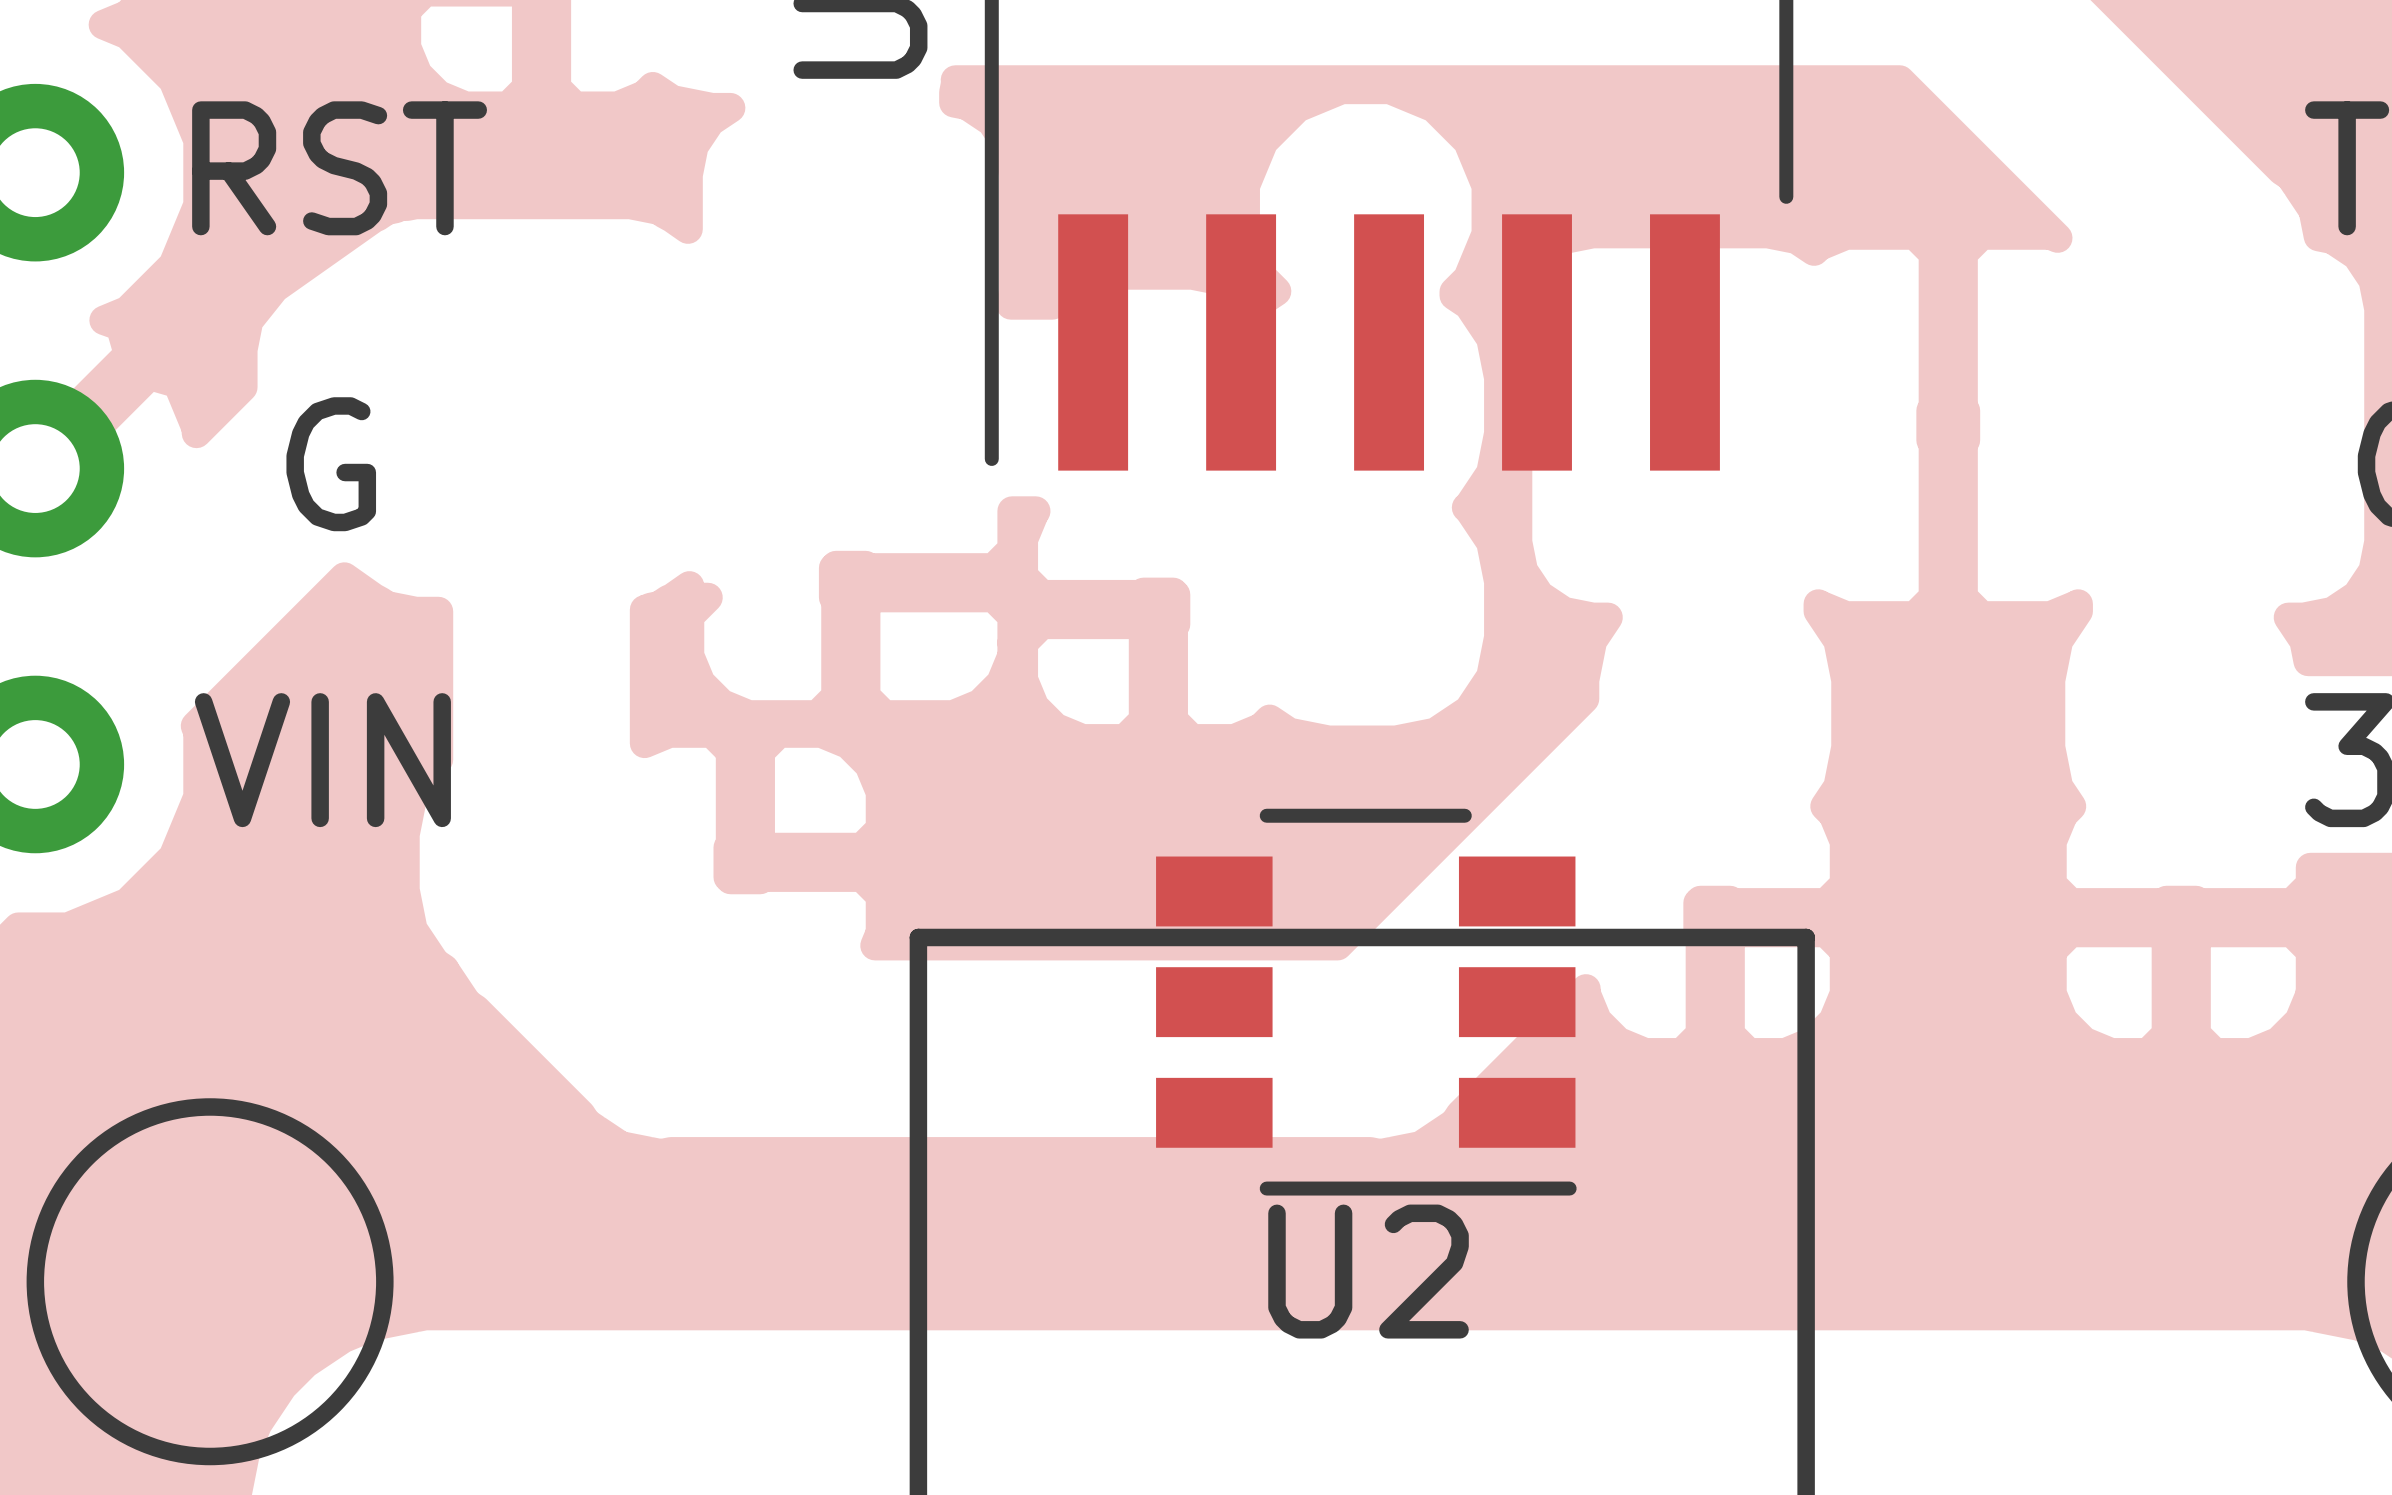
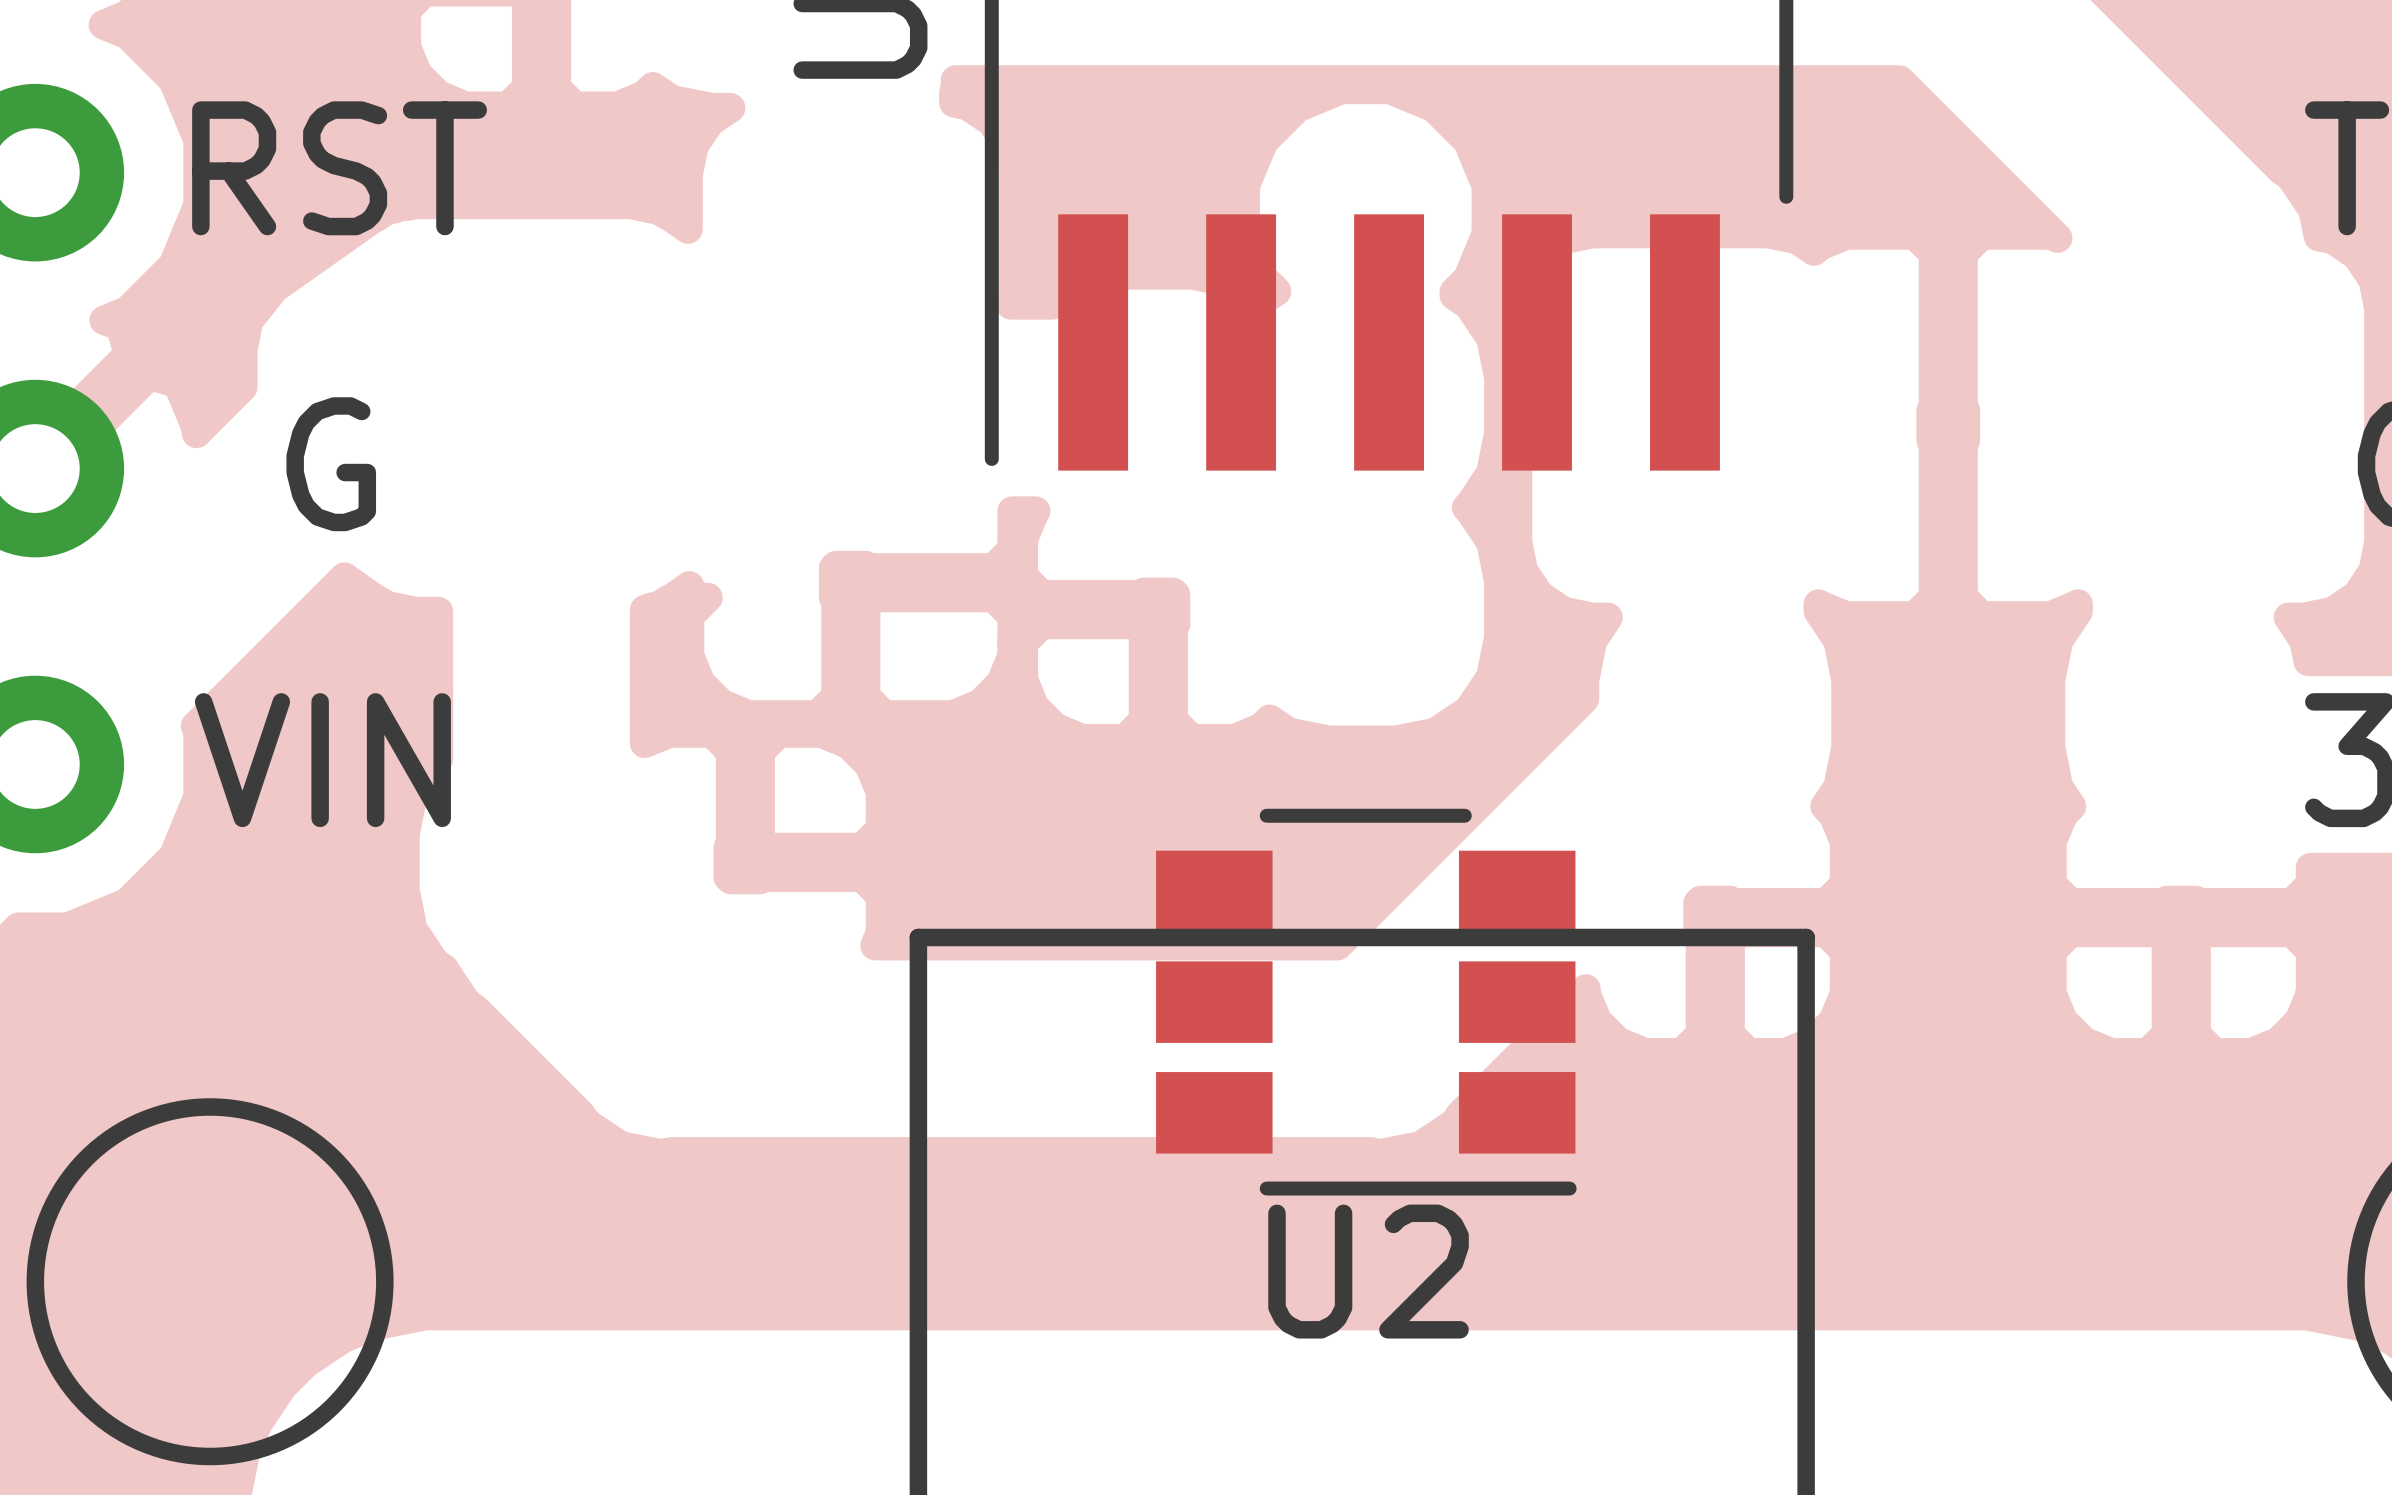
U2 footprint: [1156, 808, 1577, 1196] -> [1156, 808, 1577, 1196]

